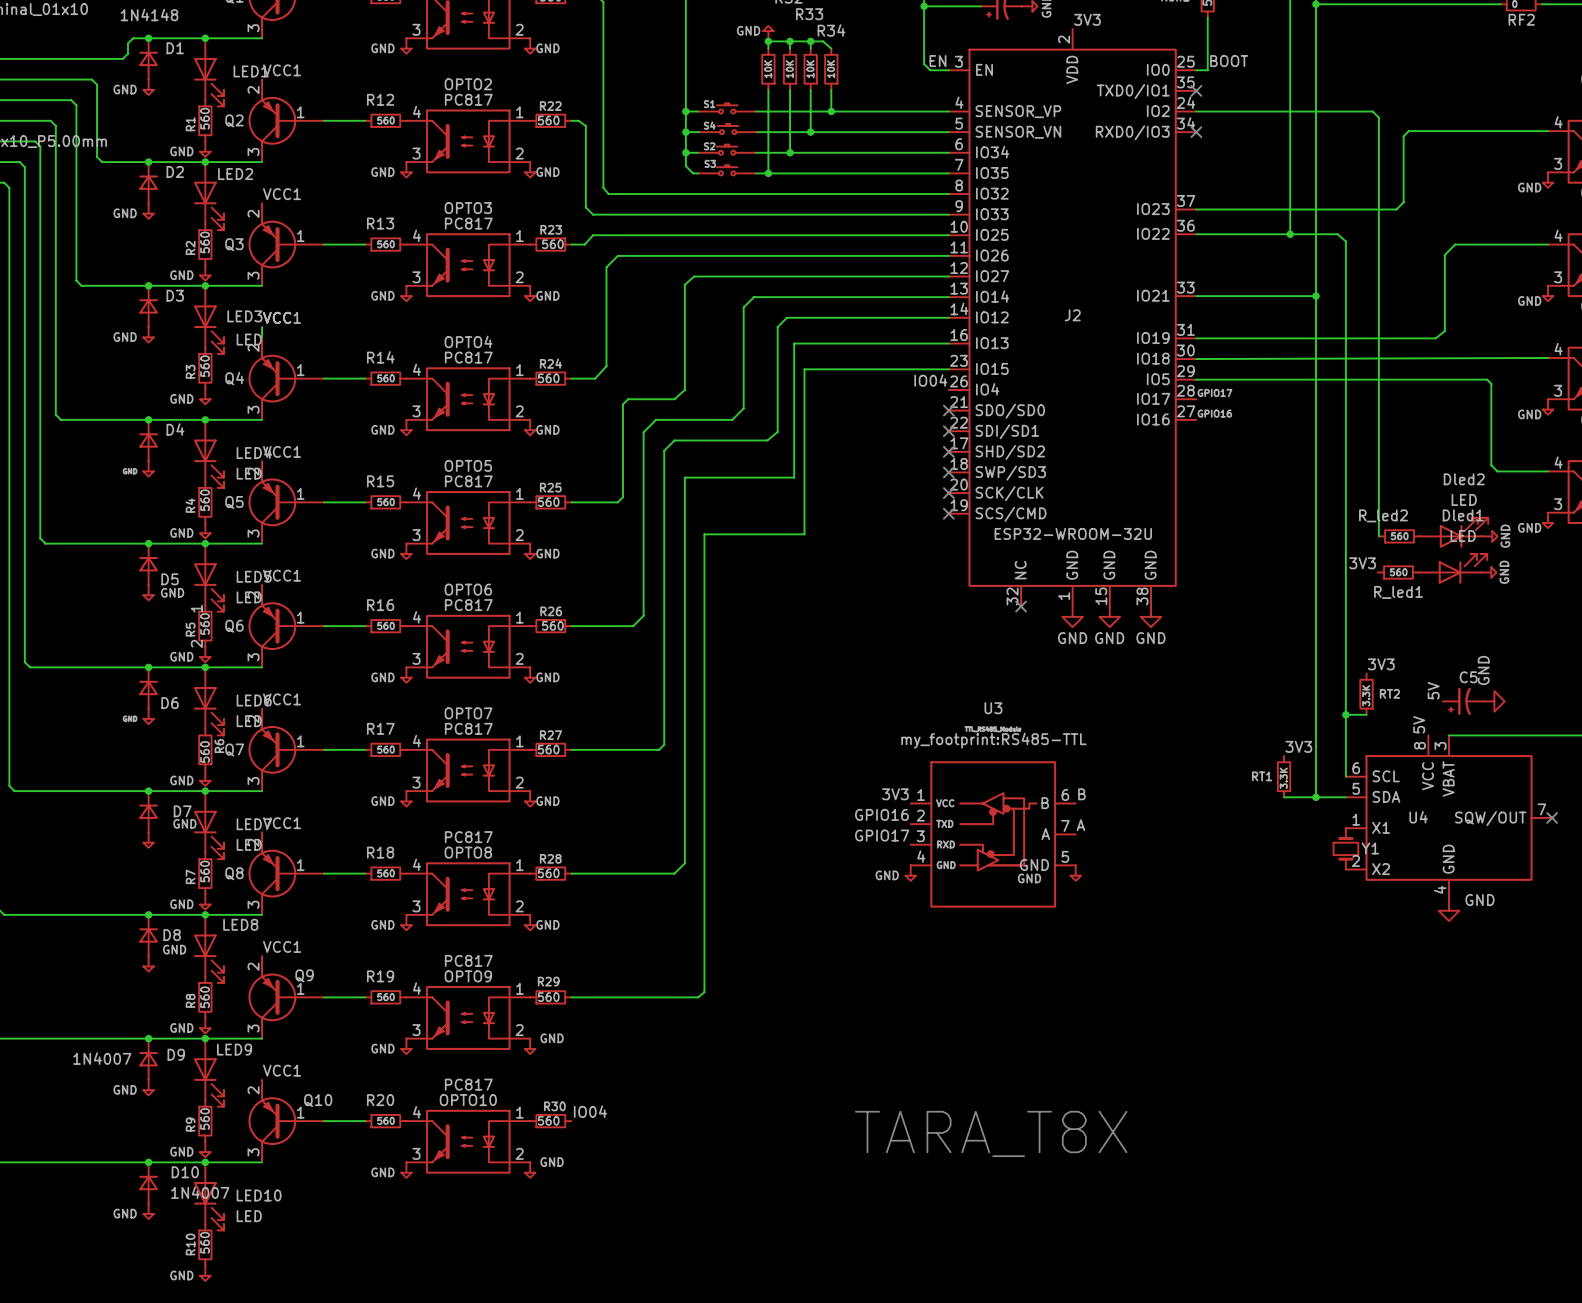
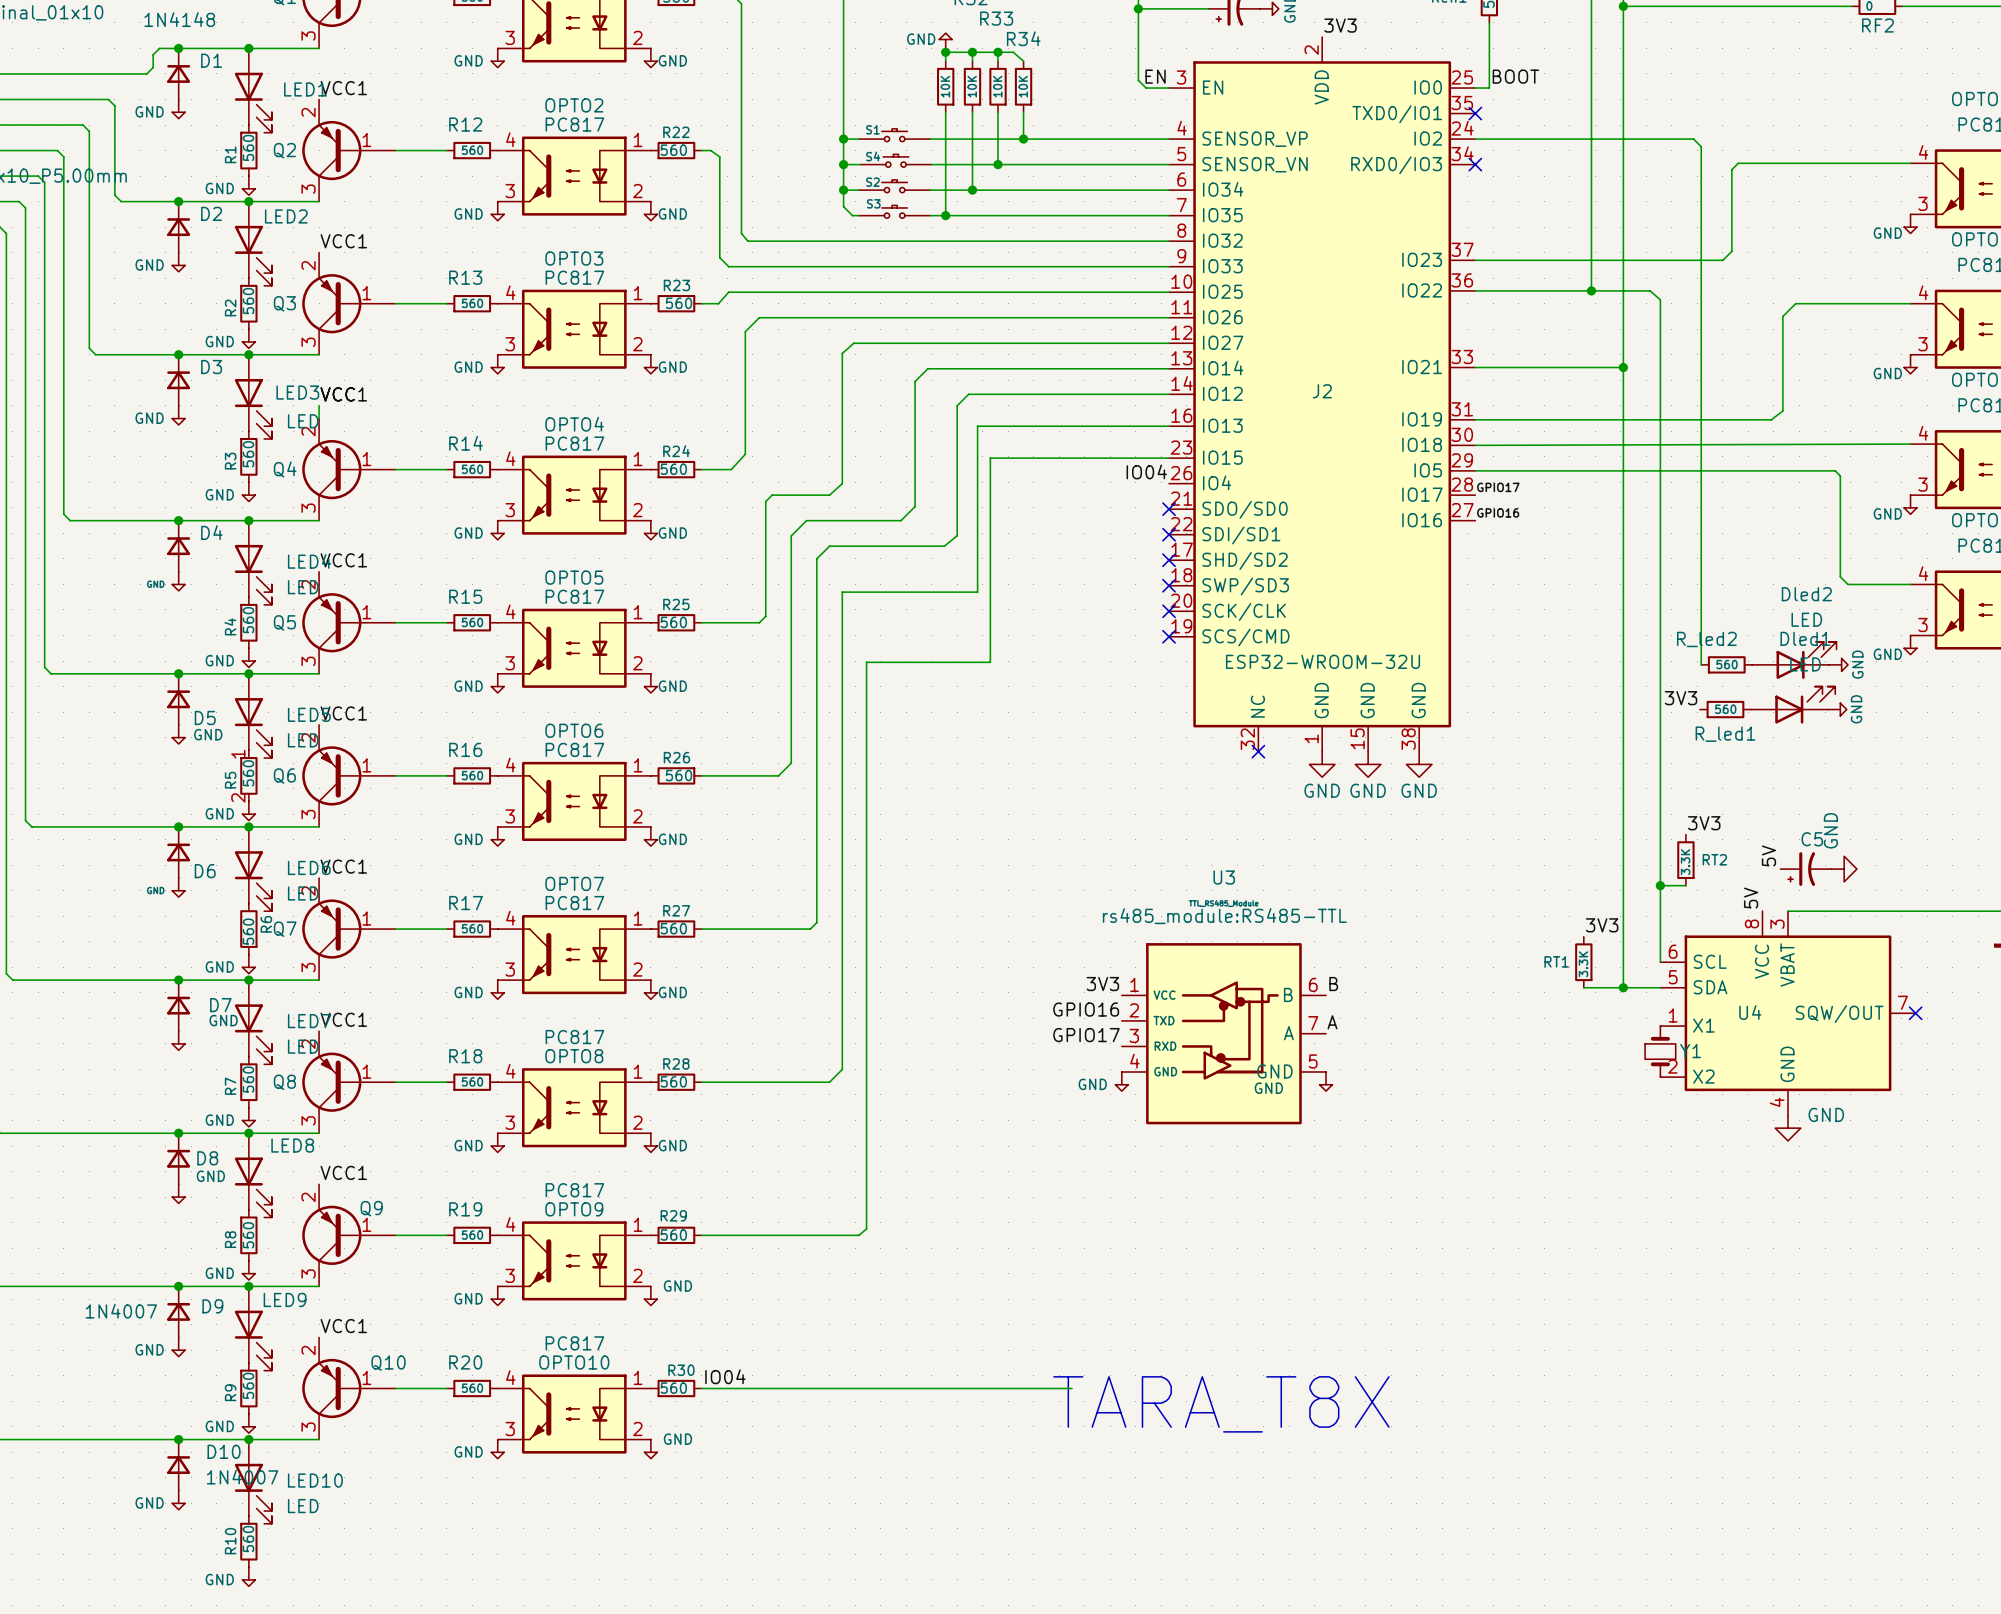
U3 text: my_footprint:RS485-TTL (993, 740) -> rs485_module:RS485-TTL (1224, 916)
wire: none -> (701, 1388) (1072, 1388)

